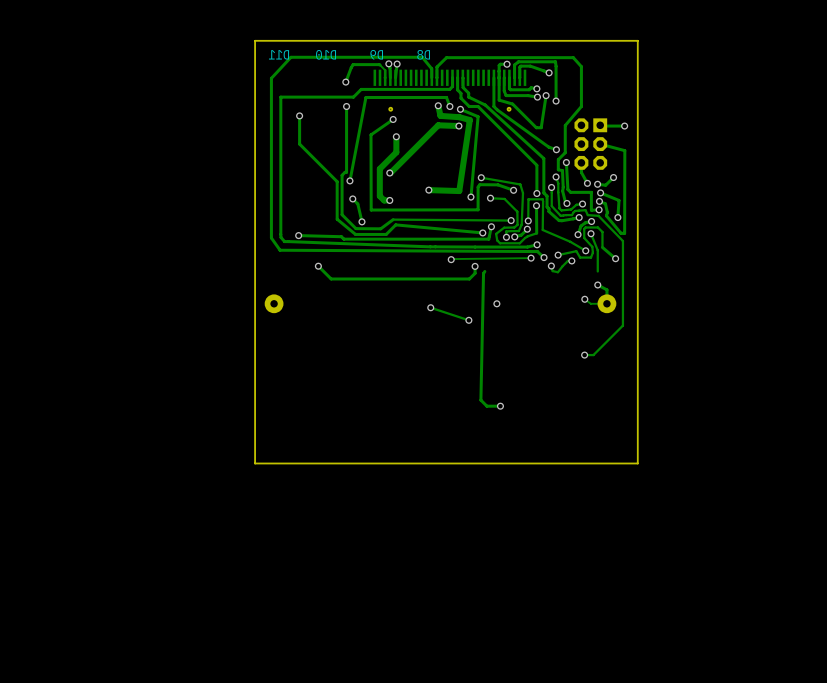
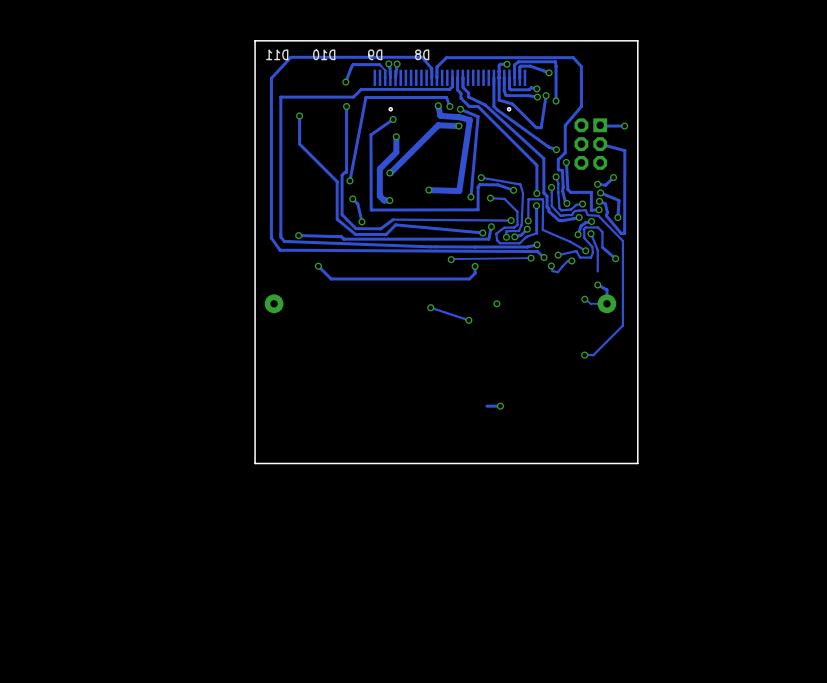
track: (581, 162) (581, 172) (587, 183) -> none
via: (587, 183) -> none
track: (484, 271) (480, 400) (486, 406) -> none

